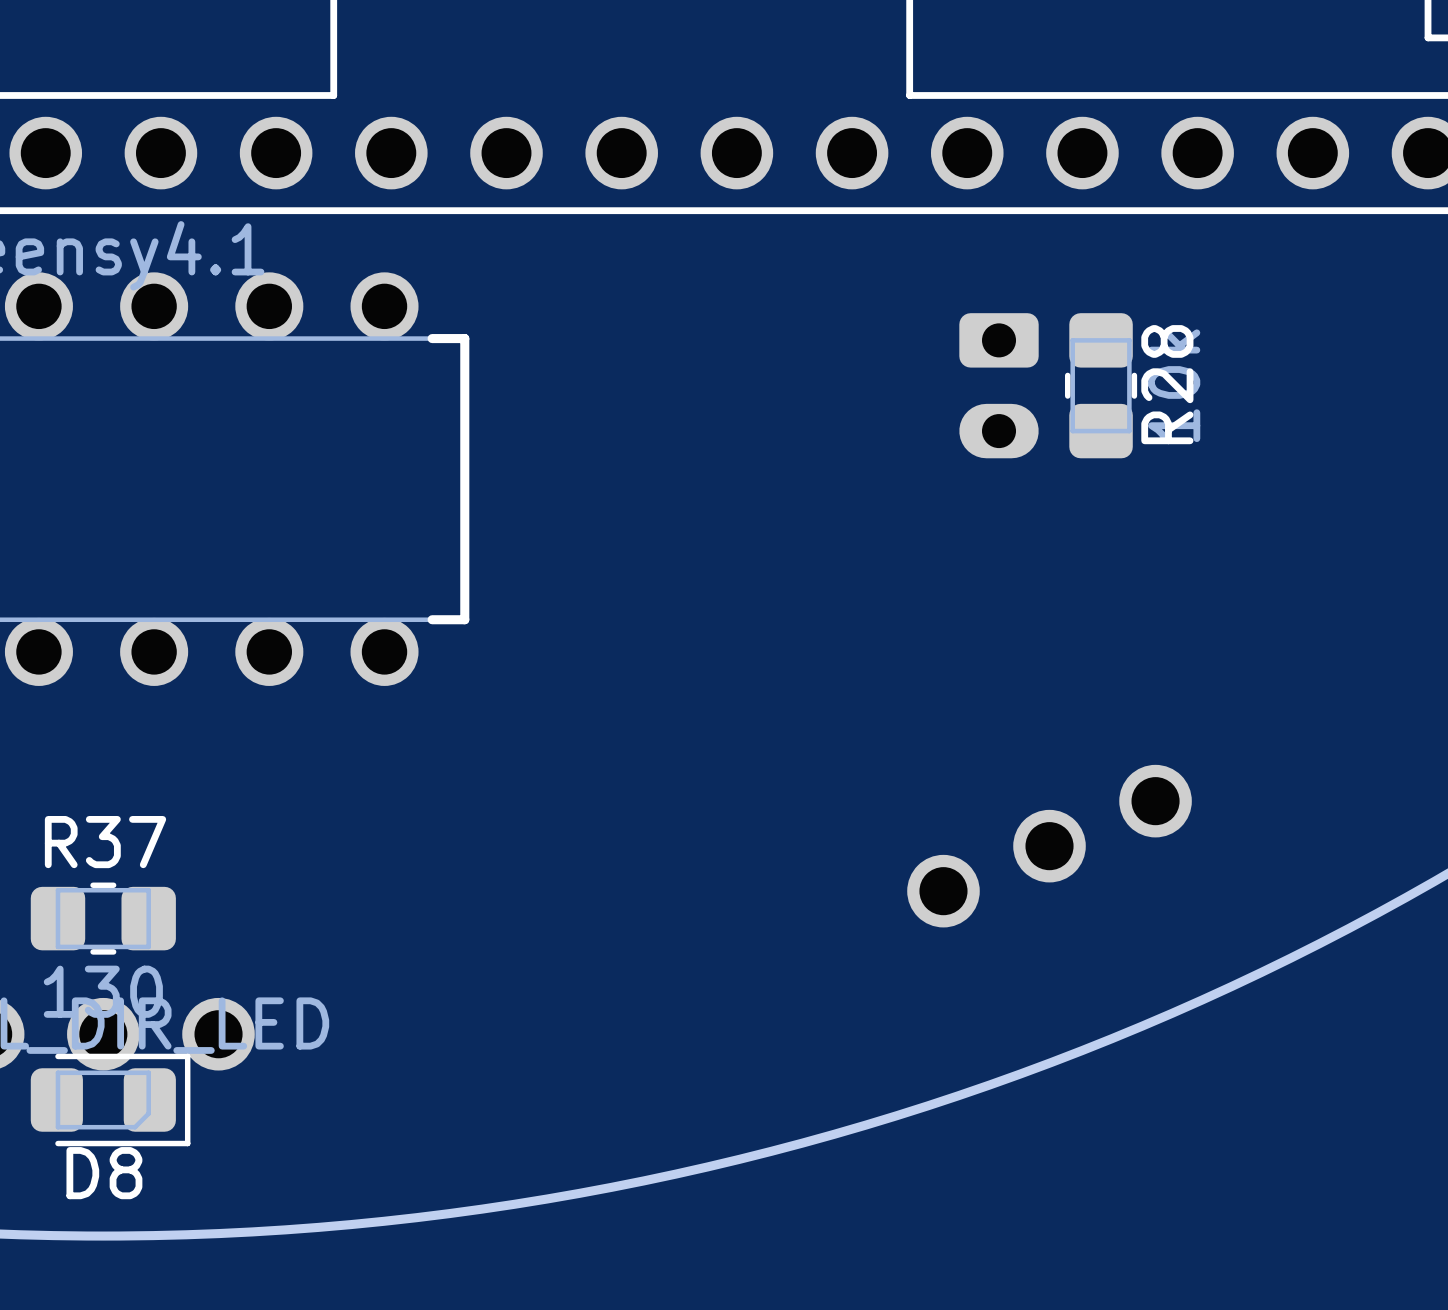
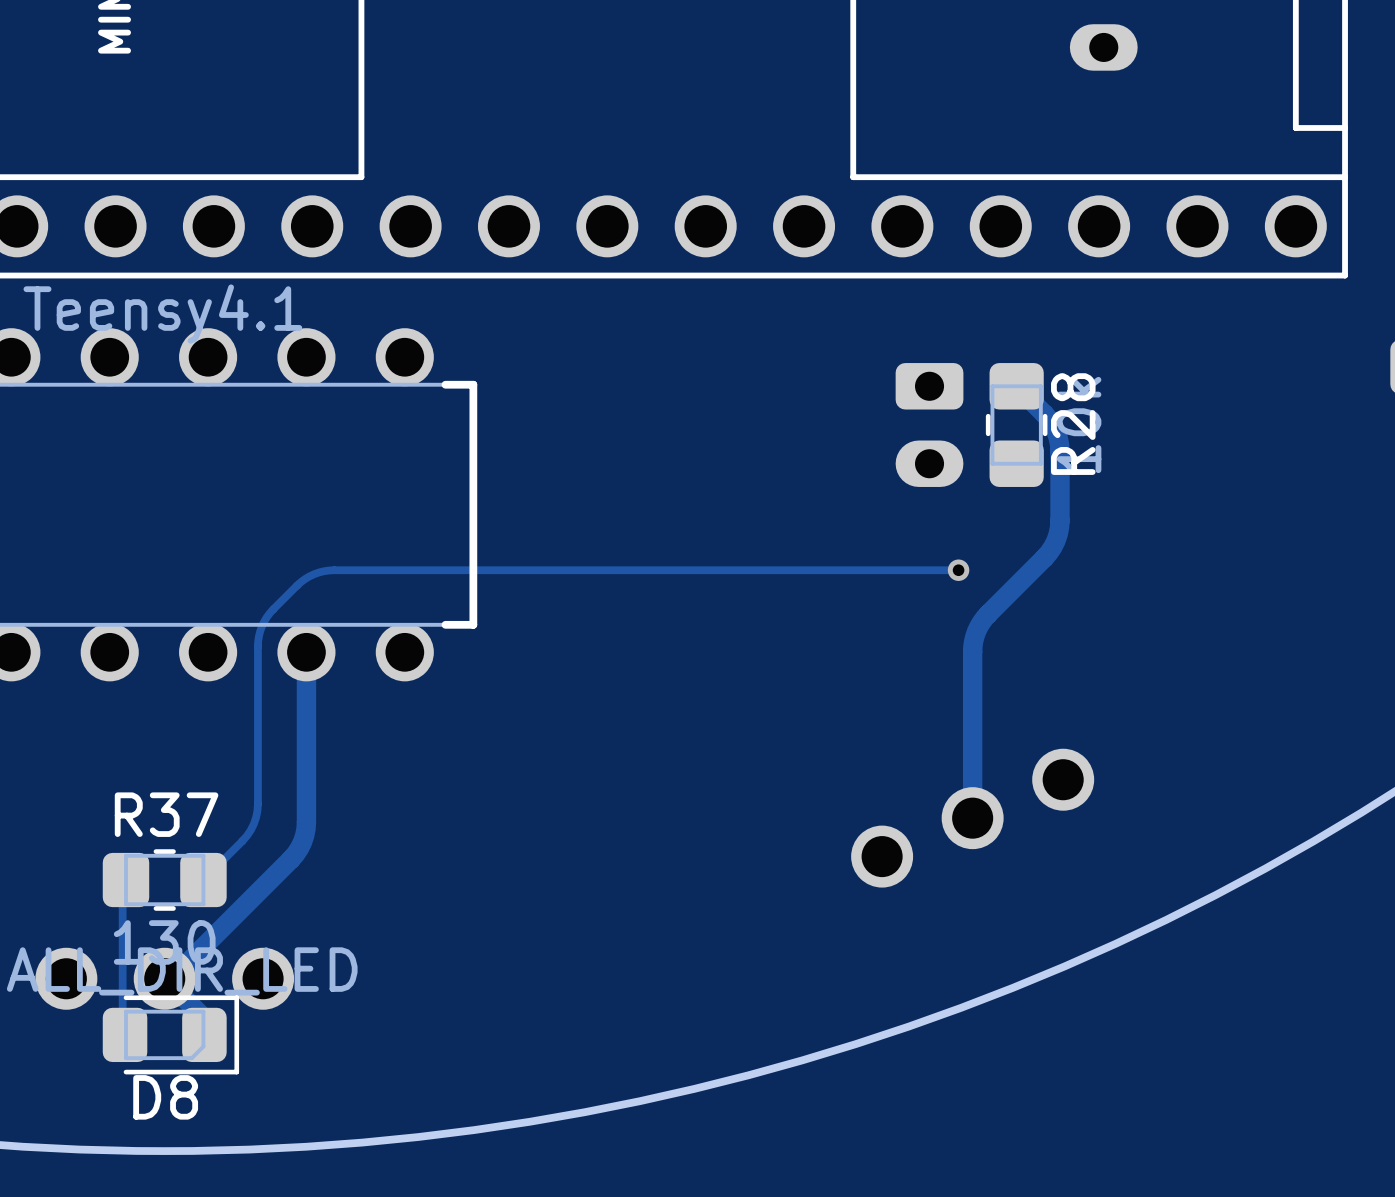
track: none -> (1016, 386) (1049, 419) (1058, 437) (1060, 451) (1059, 527) (1056, 540) (1049, 552) (984, 618) (974, 636) (972, 651) (972, 818)
track: none -> (958, 570) (334, 570) (314, 574) (300, 582) (273, 609) (261, 626) (257, 646) (257, 803) (256, 817) (247, 835) (203, 880)
via: none -> (958, 570)
track: none -> (306, 632) (306, 822) (304, 835) (299, 848) (291, 859) (174, 976) (166, 979) (204, 1018)
track: none -> (122, 883) (122, 1032)

